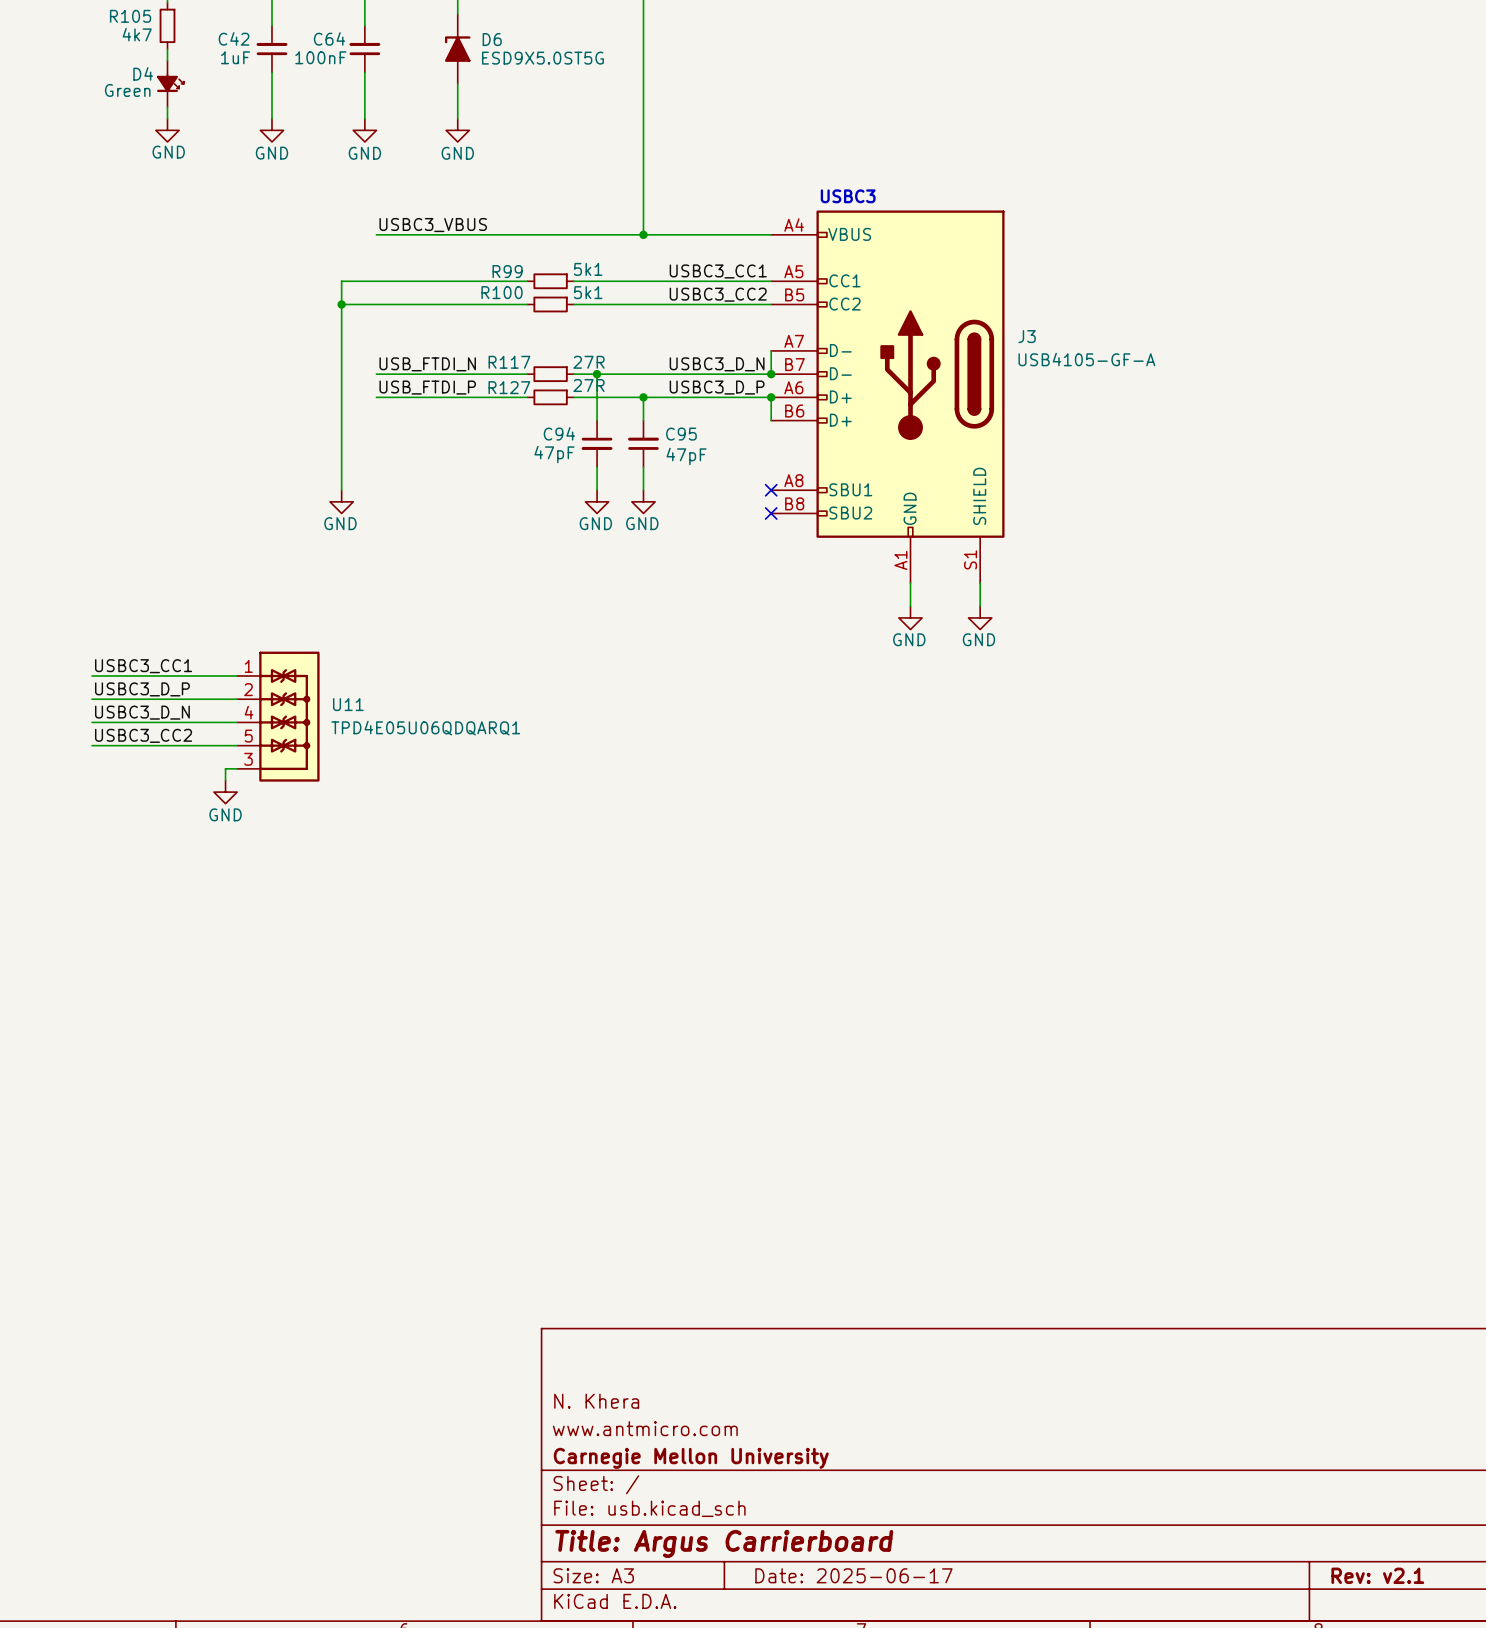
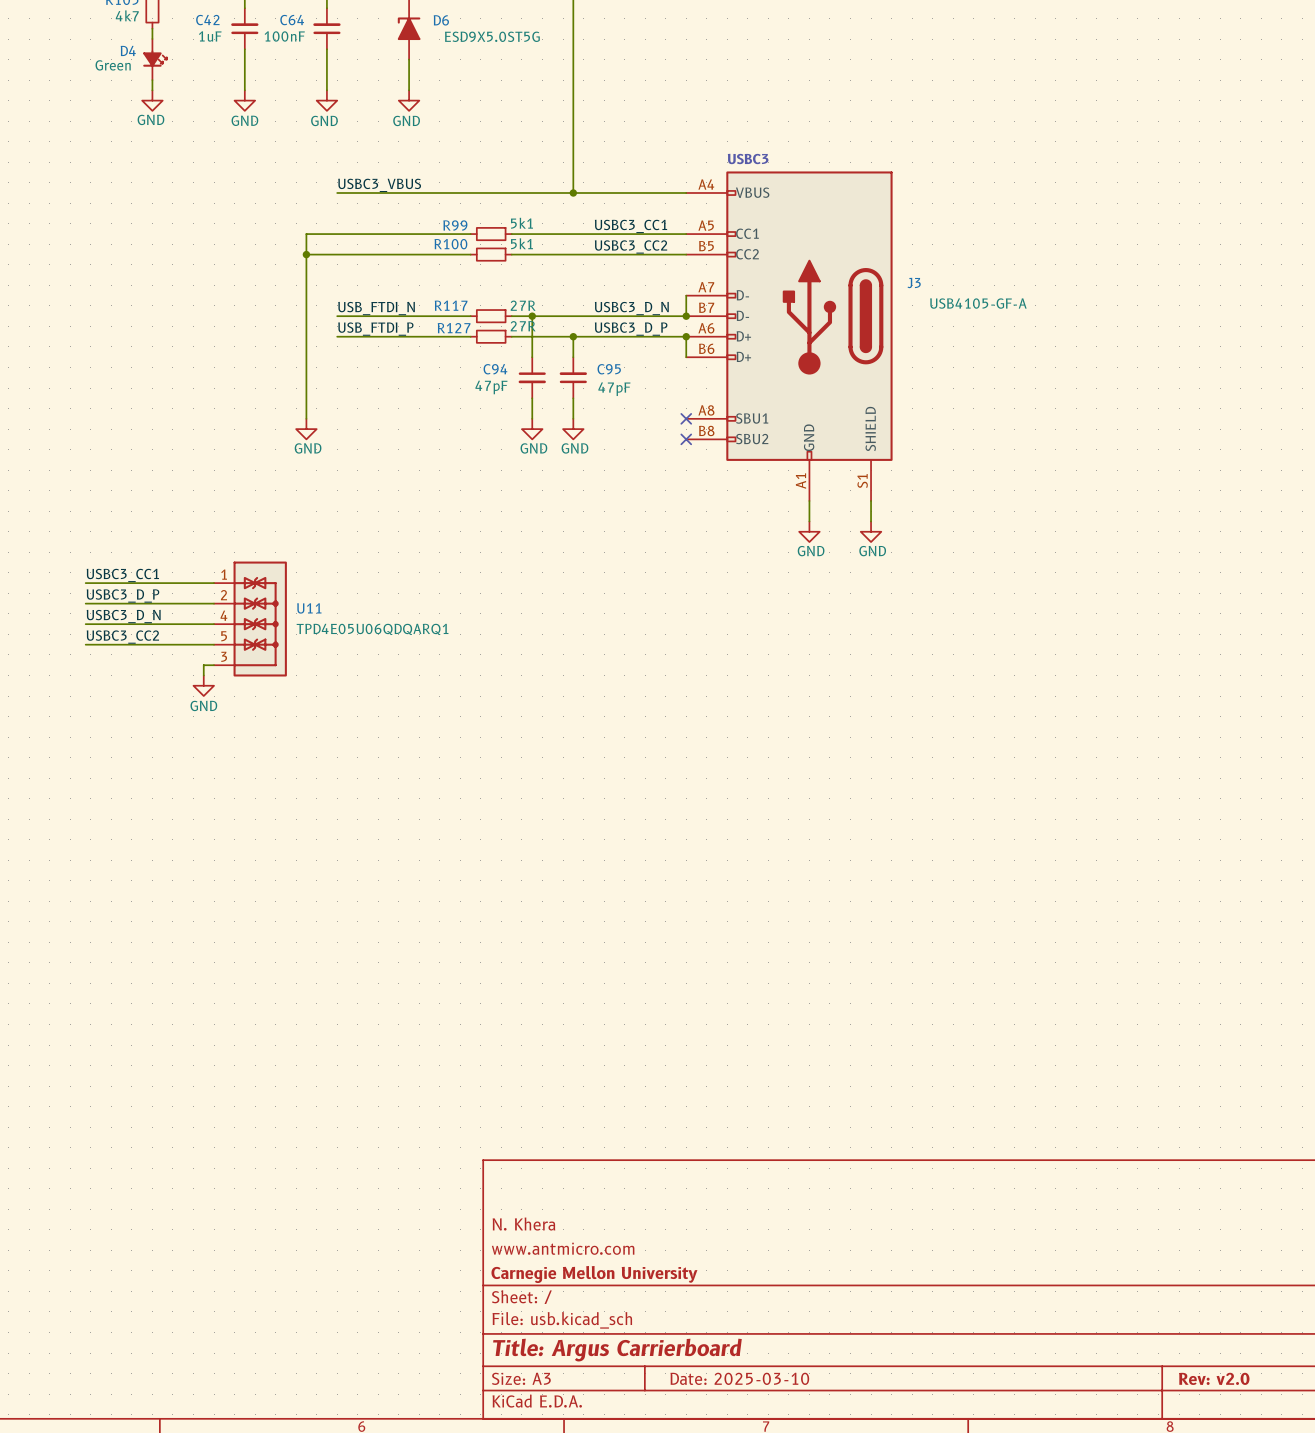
title block: Date: 2025-06-17 (853, 1575) -> Date: 2025-03-10 (739, 1378)
title block: Rev: v2.1 (1377, 1575) -> Rev: v2.0 (1214, 1378)

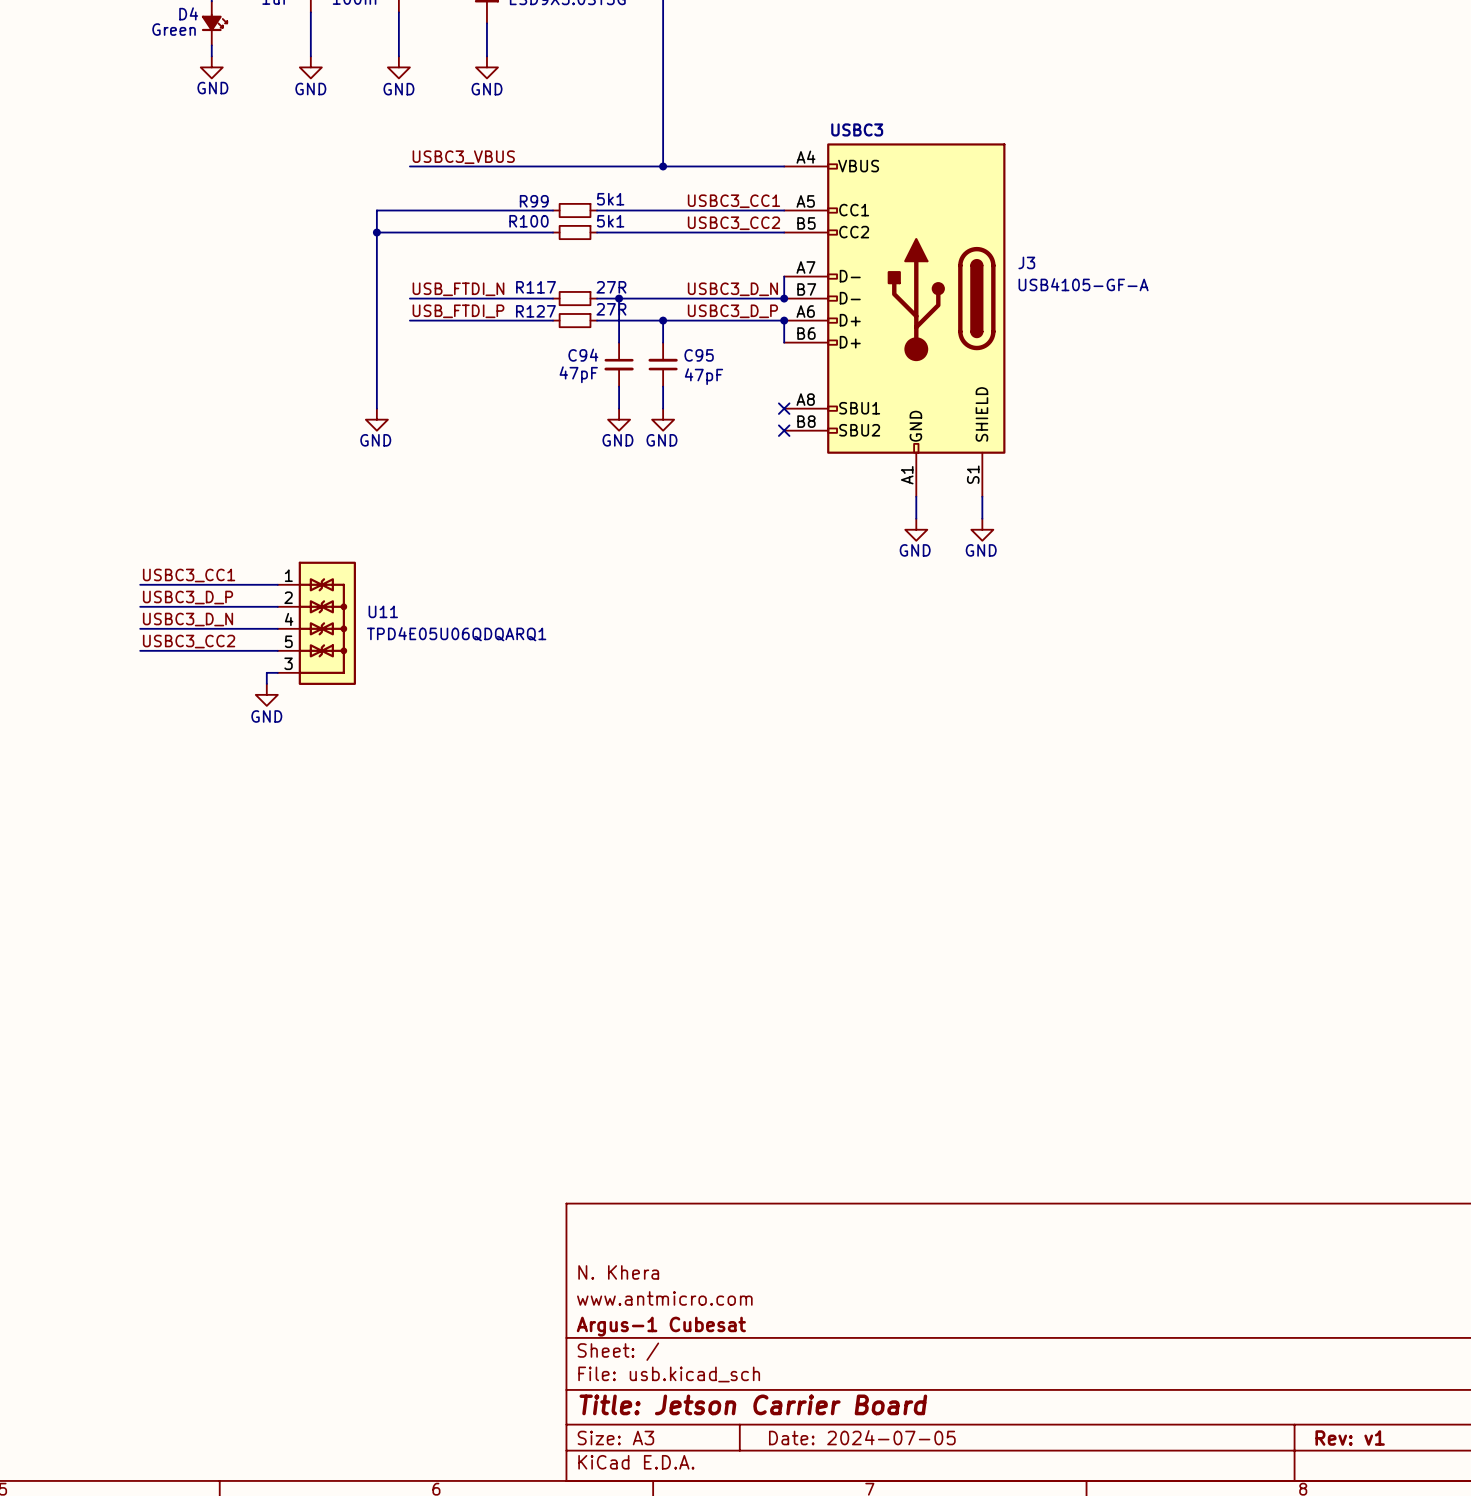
title block: Carnegie Mellon University (594, 1274) -> Argus-1 Cubesat (661, 1326)
title block: Title: Argus Carrierboard (617, 1350) -> Title: Jetson Carrier Board (753, 1404)
title block: Date: 2025-03-10 (739, 1378) -> Date: 2024-07-05 (862, 1437)
title block: Rev: v2.0 (1214, 1378) -> Rev: v1 (1350, 1438)

